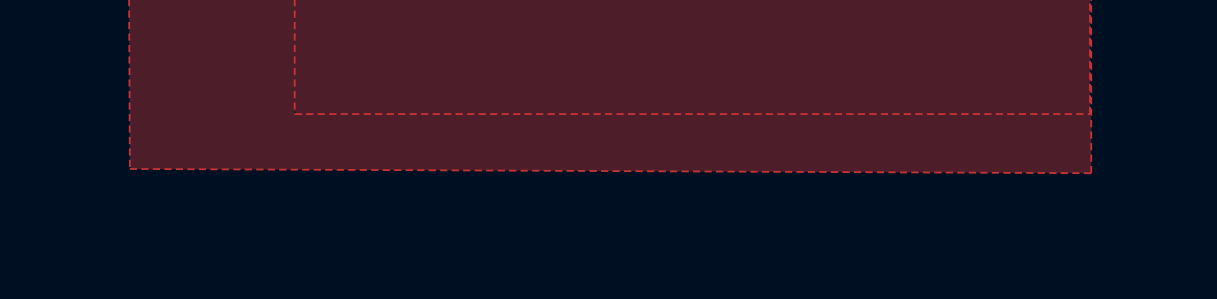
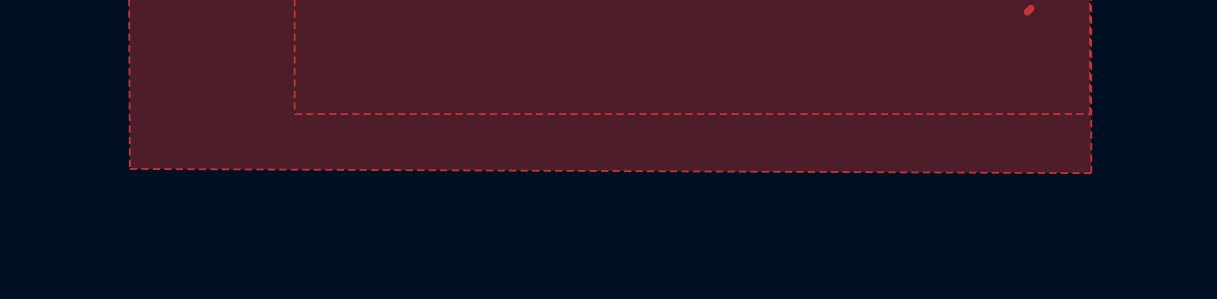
top track: none -> (1030, 8) (1027, 11)

